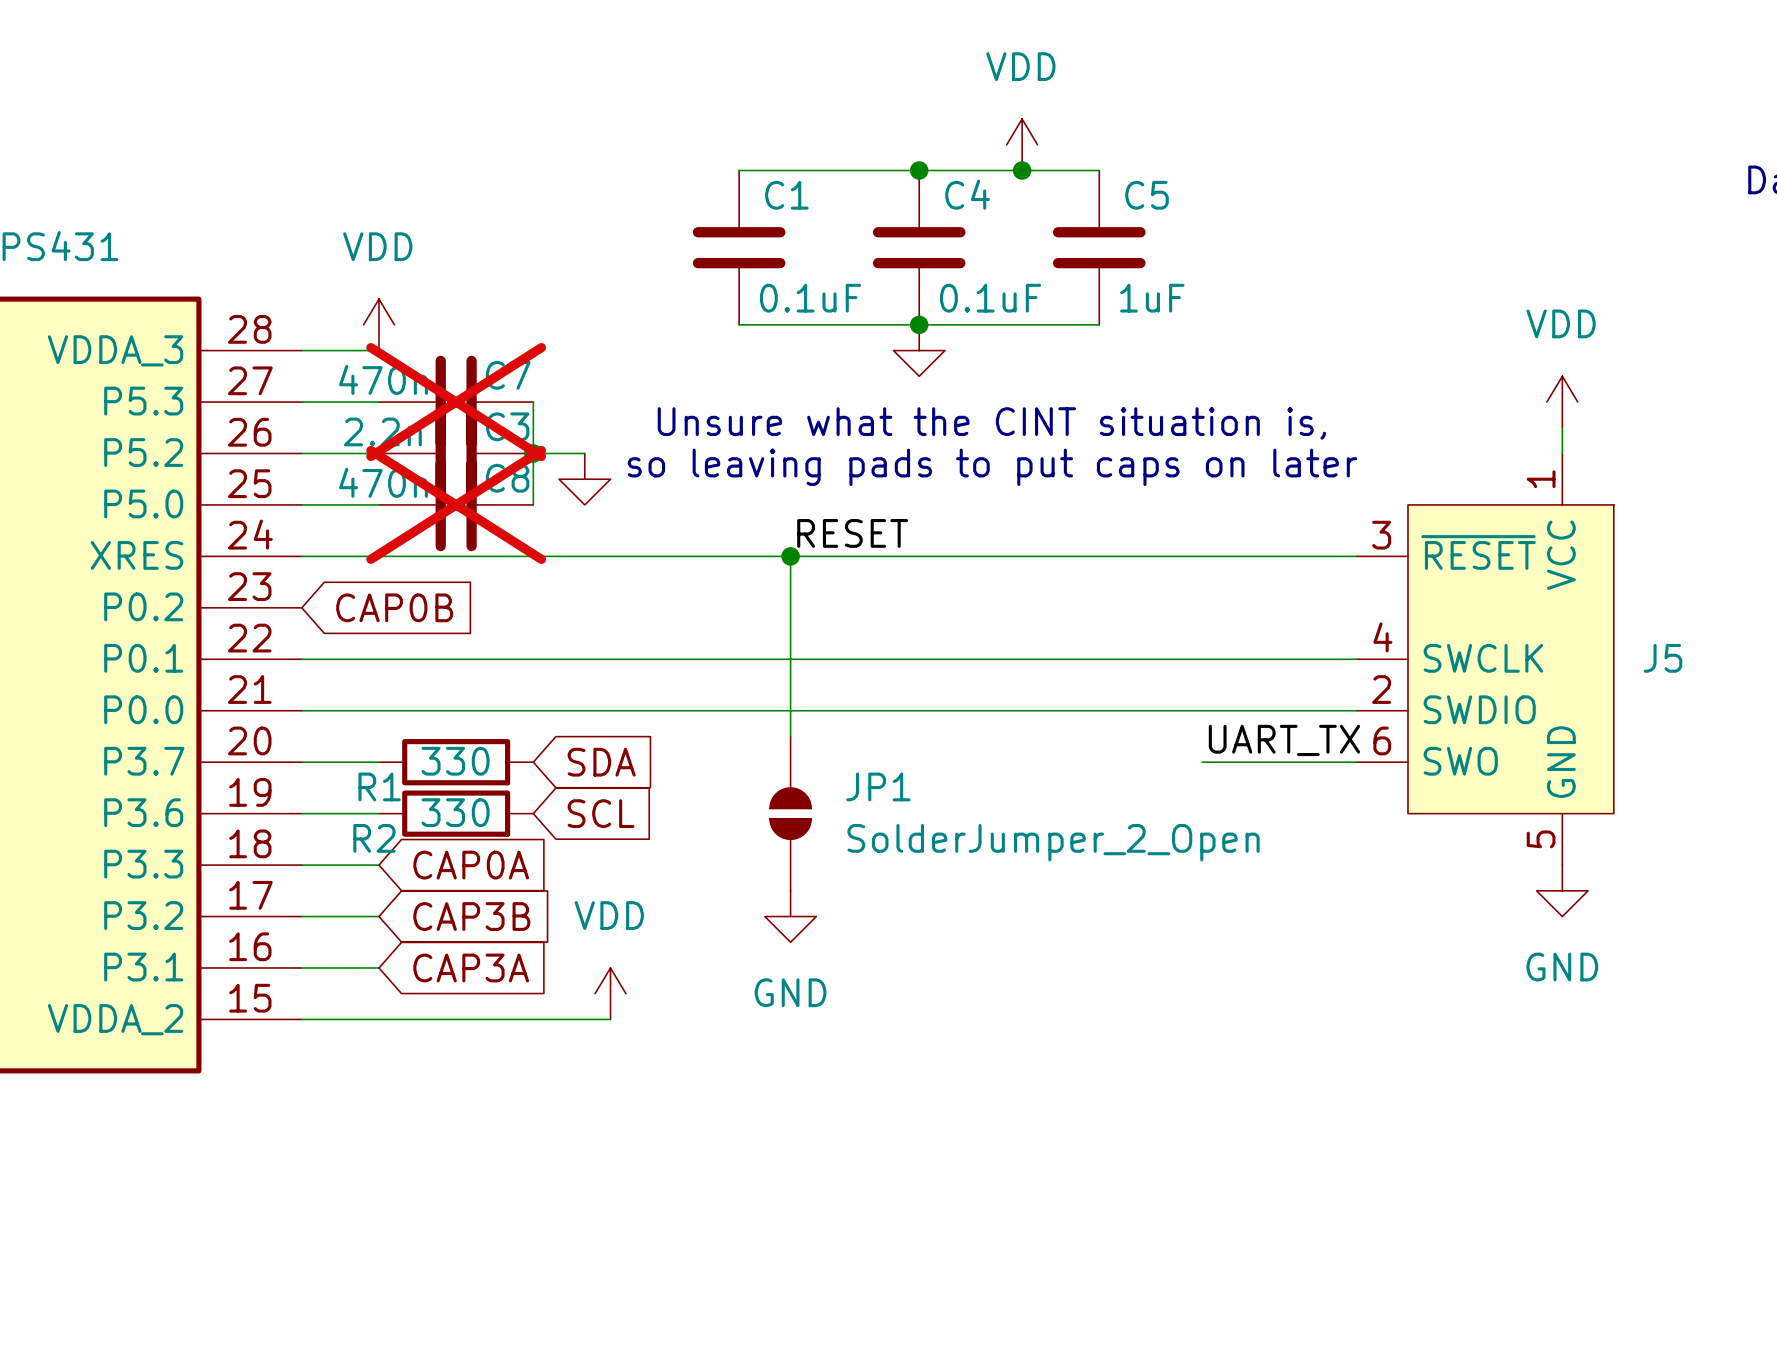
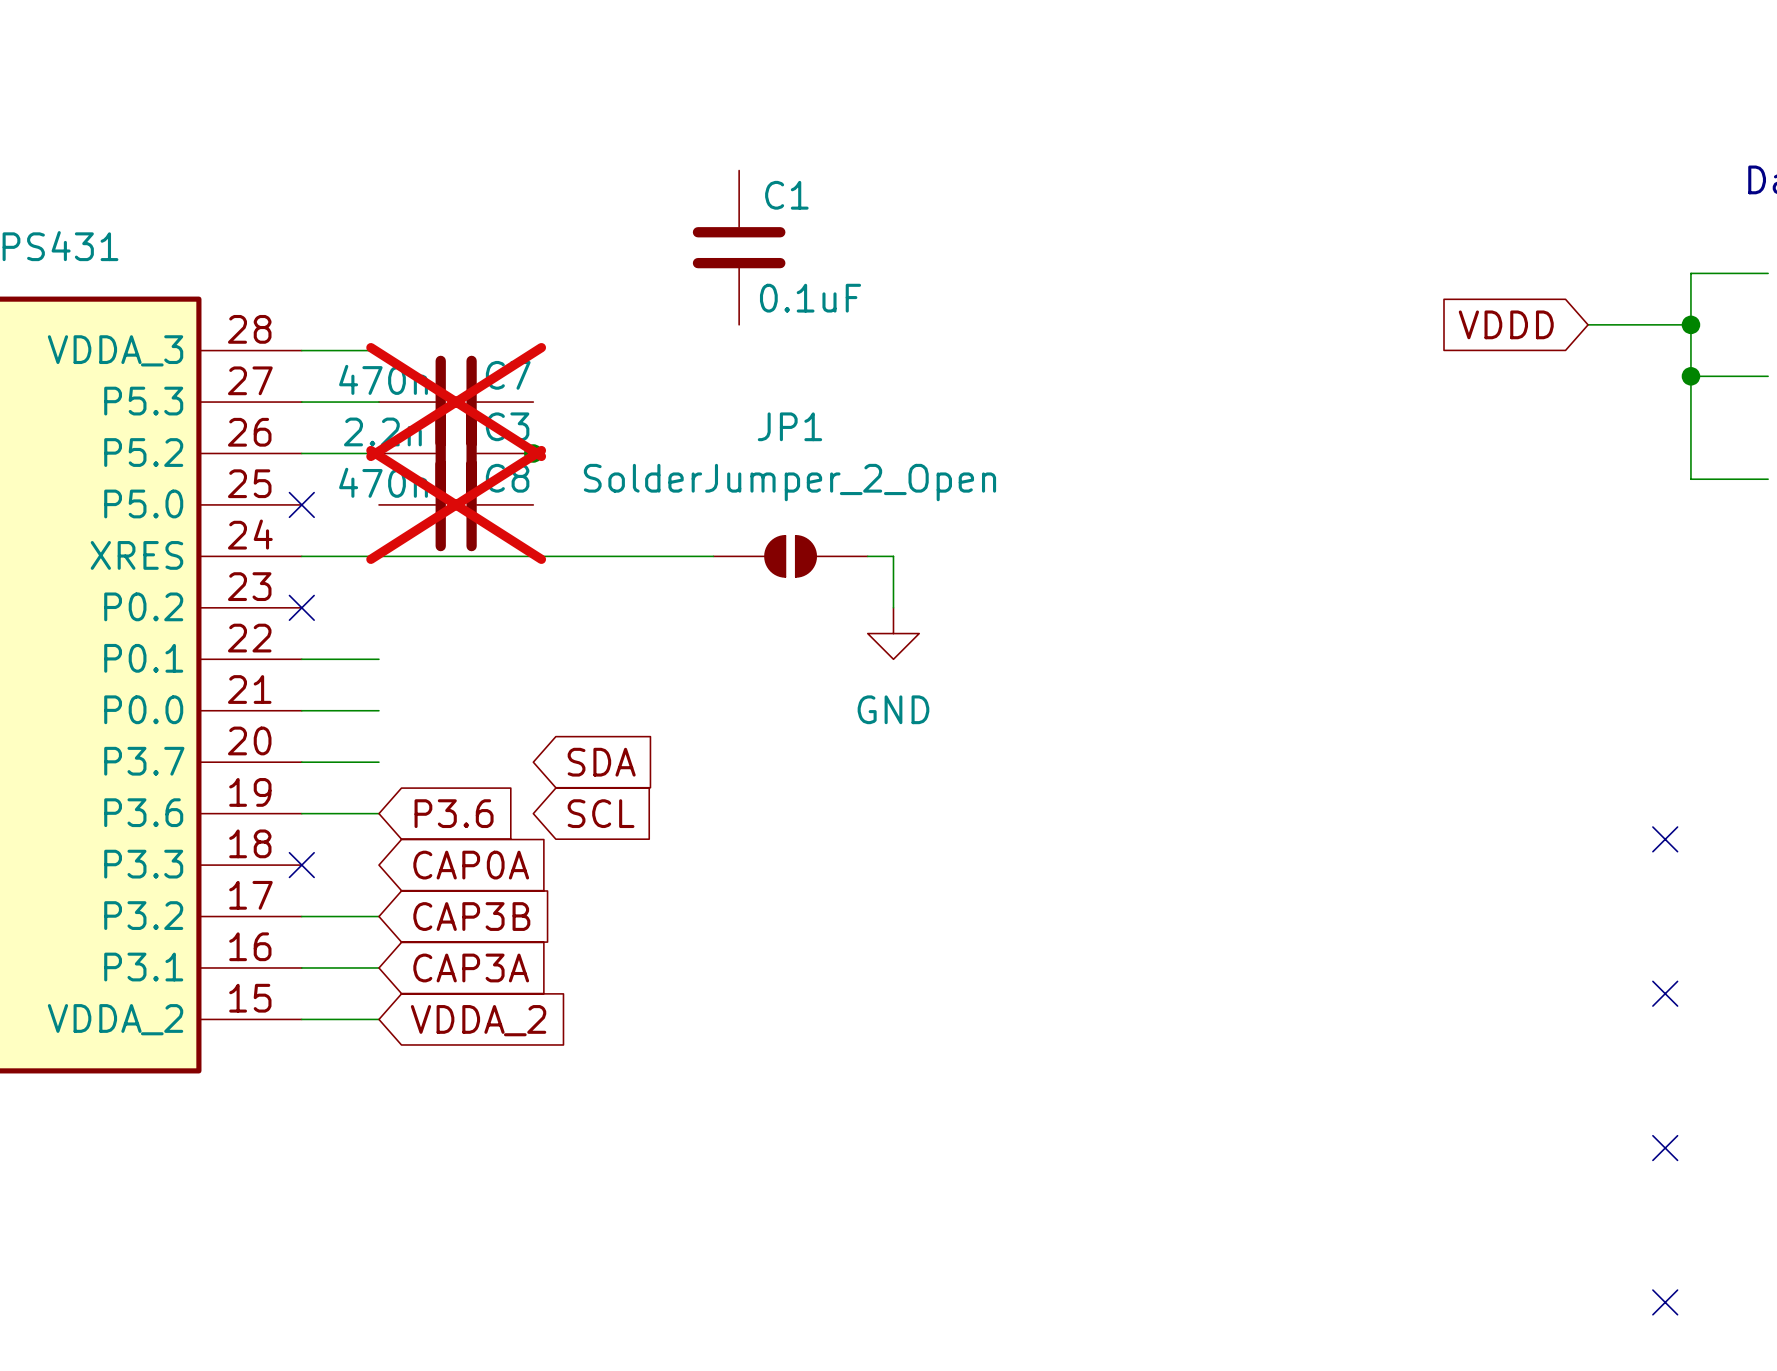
power symbol: VDD (1022, 144) -> none
wire: (739, 170) (1099, 170) -> none
junction: (919, 170) -> none
junction: (1022, 170) -> none
C4: 0.1uF (919, 247) -> none
C5: 1uF (1099, 247) -> none
wire: none -> (1768, 273) (1690, 273) (1690, 479) (1768, 479)
power symbol: VDD (378, 324) -> none
wire: (739, 324) (1099, 324) -> none
junction: (919, 324) -> none
global label: none -> VDDD (1506, 324)
wire: none -> (1588, 324) (1690, 324)
junction: none -> (1690, 324)
power symbol: (919, 350) -> none
wire: none -> (1690, 376) (1768, 376)
junction: none -> (1690, 376)
wire: (533, 402) (533, 504) -> none
power symbol: VDD (1562, 402) -> none
text: Unsure what the CINT situation is, (991, 423) -> none
wire: (1562, 427) (1562, 453) -> none
wire: (533, 453) (584, 453) -> none
text: so leaving pads to put caps on later (992, 467) -> none
power symbol: (584, 479) -> none
wire: (301, 504) (378, 504) -> none
no-connect mark: none -> (301, 504)
label: RESET (852, 533) -> none
wire: (790, 556) (790, 736) -> none
junction: (790, 556) -> none
wire: (893, 556) (1356, 556) -> (893, 556) (893, 607)
no-connect mark: none -> (301, 607)
global label: CAP0B (394, 607) -> none
wire: (378, 659) (1356, 659) -> none
J5: (1485, 659) -> none
wire: (378, 710) (1356, 710) -> none
label: UART_TX (1284, 740) -> none
R1: 330 (456, 762) -> none
wire: (1202, 762) (1356, 762) -> none
JP1 name position: JP1 (878, 786) -> JP1 (789, 426)
global label: none -> P3.6 (454, 813)
R2: 330 (456, 813) -> none
JP1 rotation: 0° (790, 813) -> 90° clockwise (790, 556)
JP1 position: (790, 813) -> (790, 556)
no-connect mark: none -> (1665, 839)
JP1 value position: SolderJumper_2_Open (1053, 842) -> SolderJumper_2_Open (789, 482)
wire: (301, 865) (378, 865) -> none
no-connect mark: none -> (301, 865)
power symbol: GND (1562, 890) -> none
power symbol position: GND (790, 916) -> GND (893, 633)
power symbol: VDD (610, 993) -> none
no-connect mark: none -> (1665, 993)
wire: (378, 1019) (610, 1019) -> none
global label: none -> VDDA_2 (478, 1020)
no-connect mark: none -> (1665, 1148)
no-connect mark: none -> (1665, 1302)

